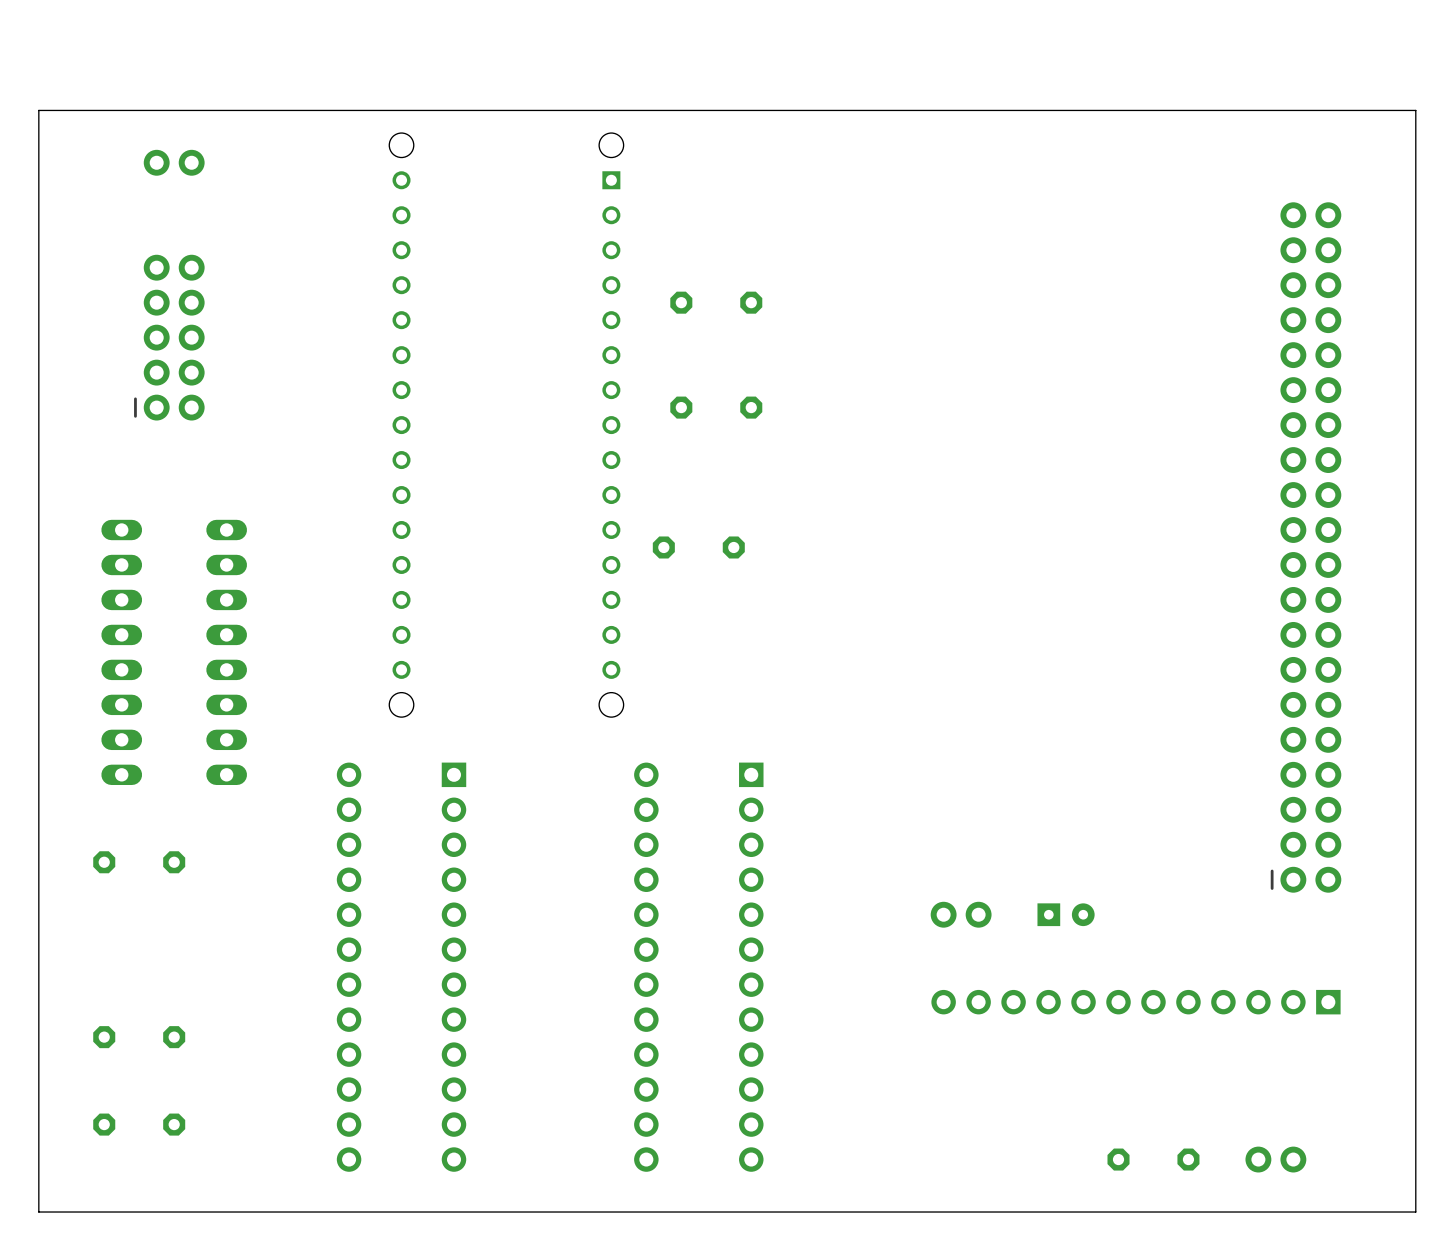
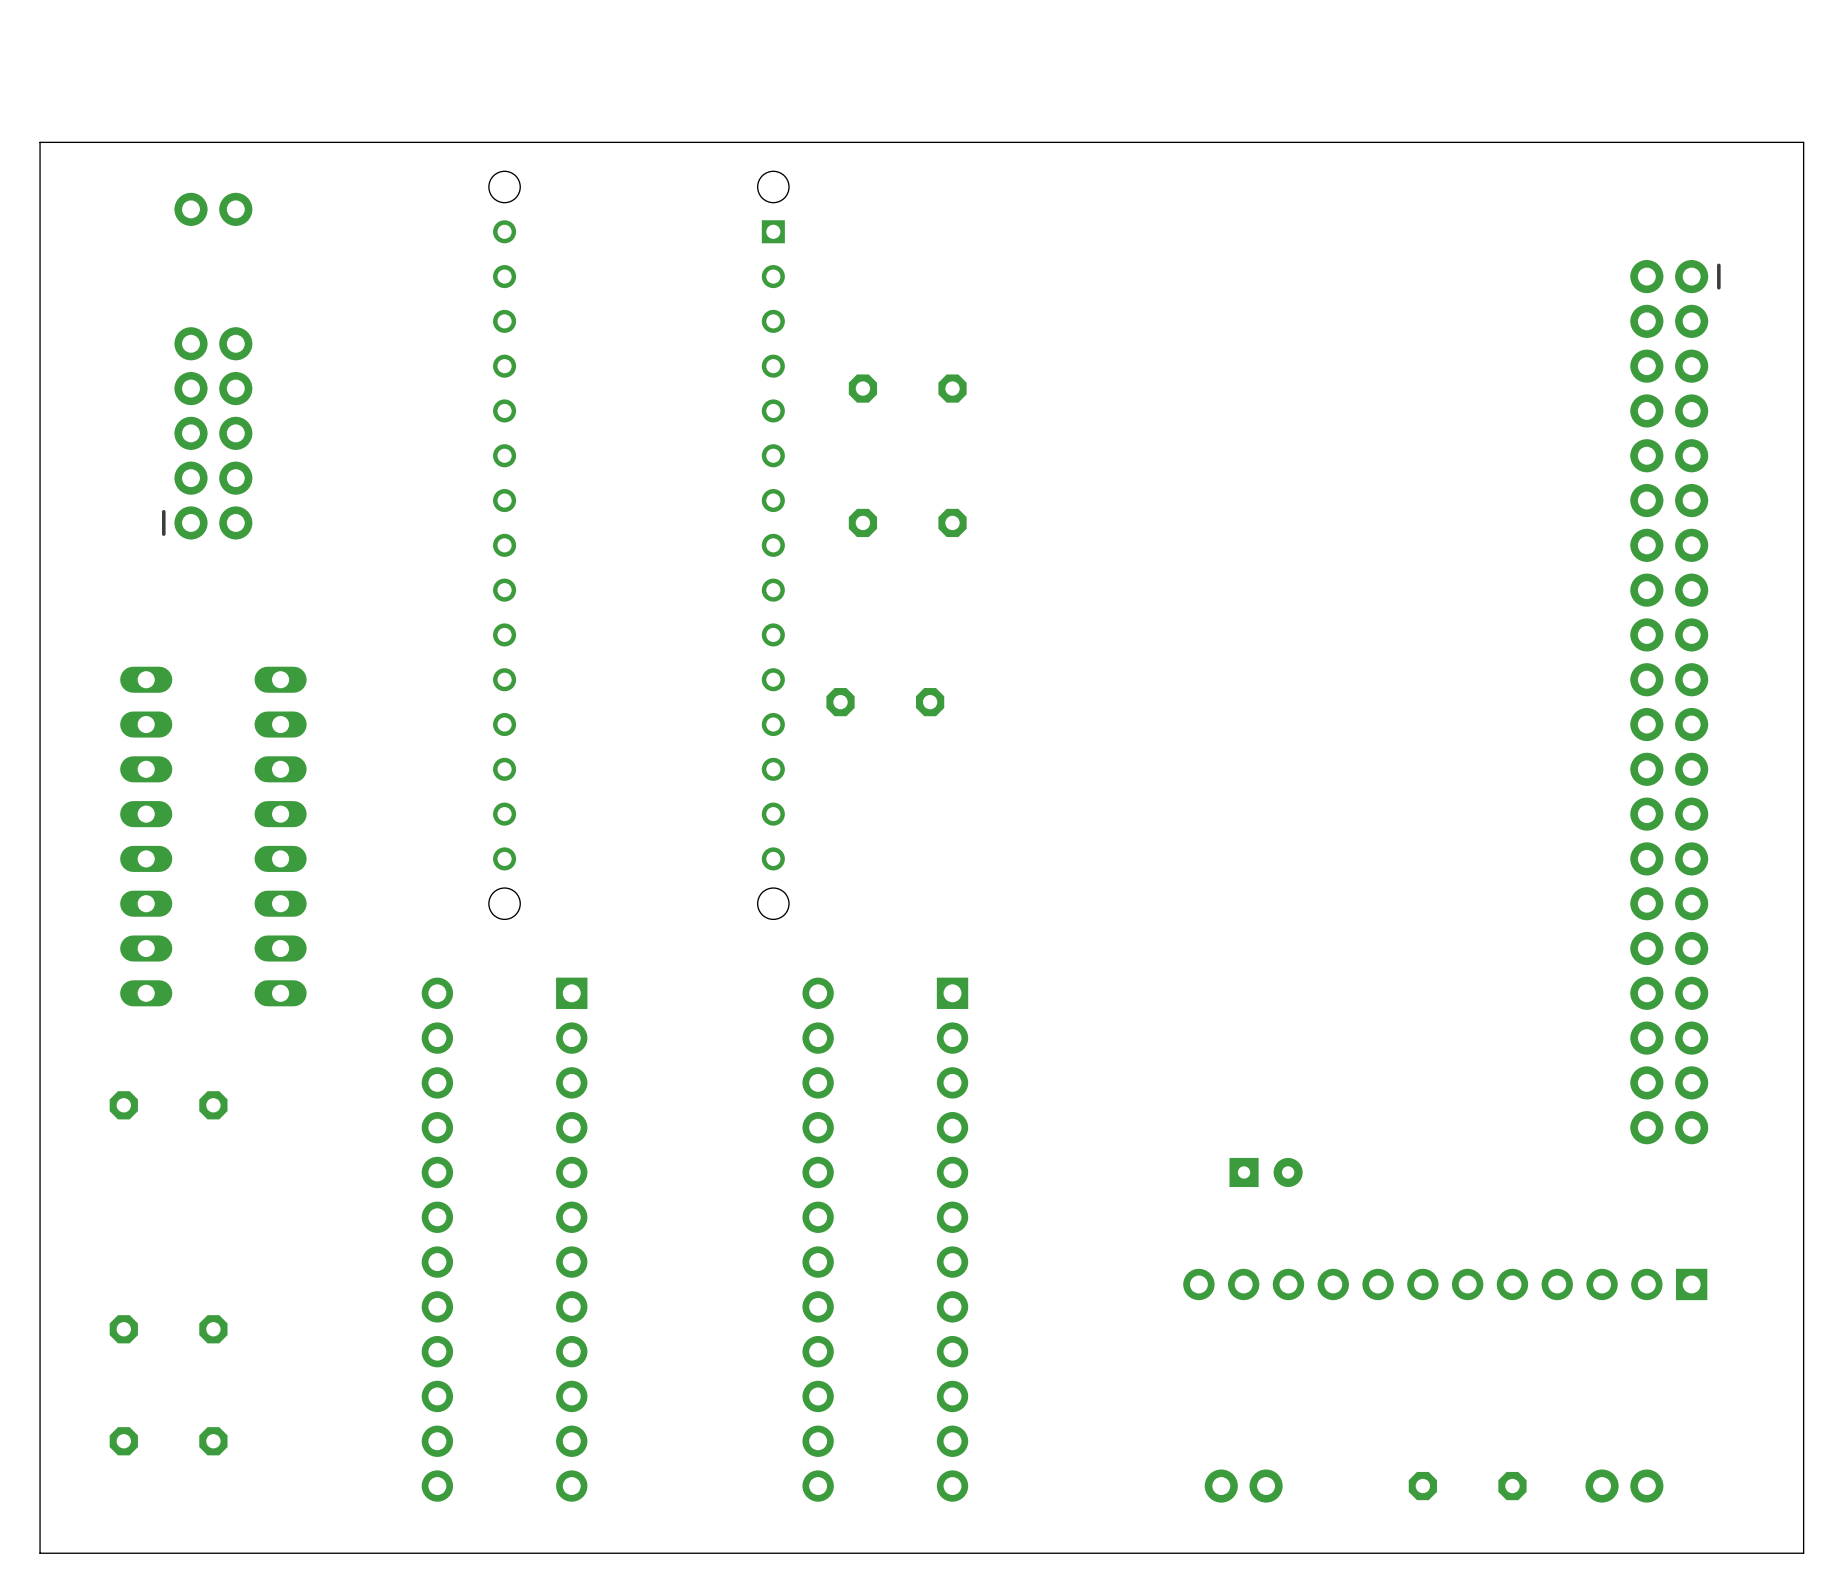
part rotation: 0° (1306, 547) -> 180° (1675, 702)
part position: (961, 914) -> (1243, 1486)
part position: (1066, 914) -> (1266, 1172)

